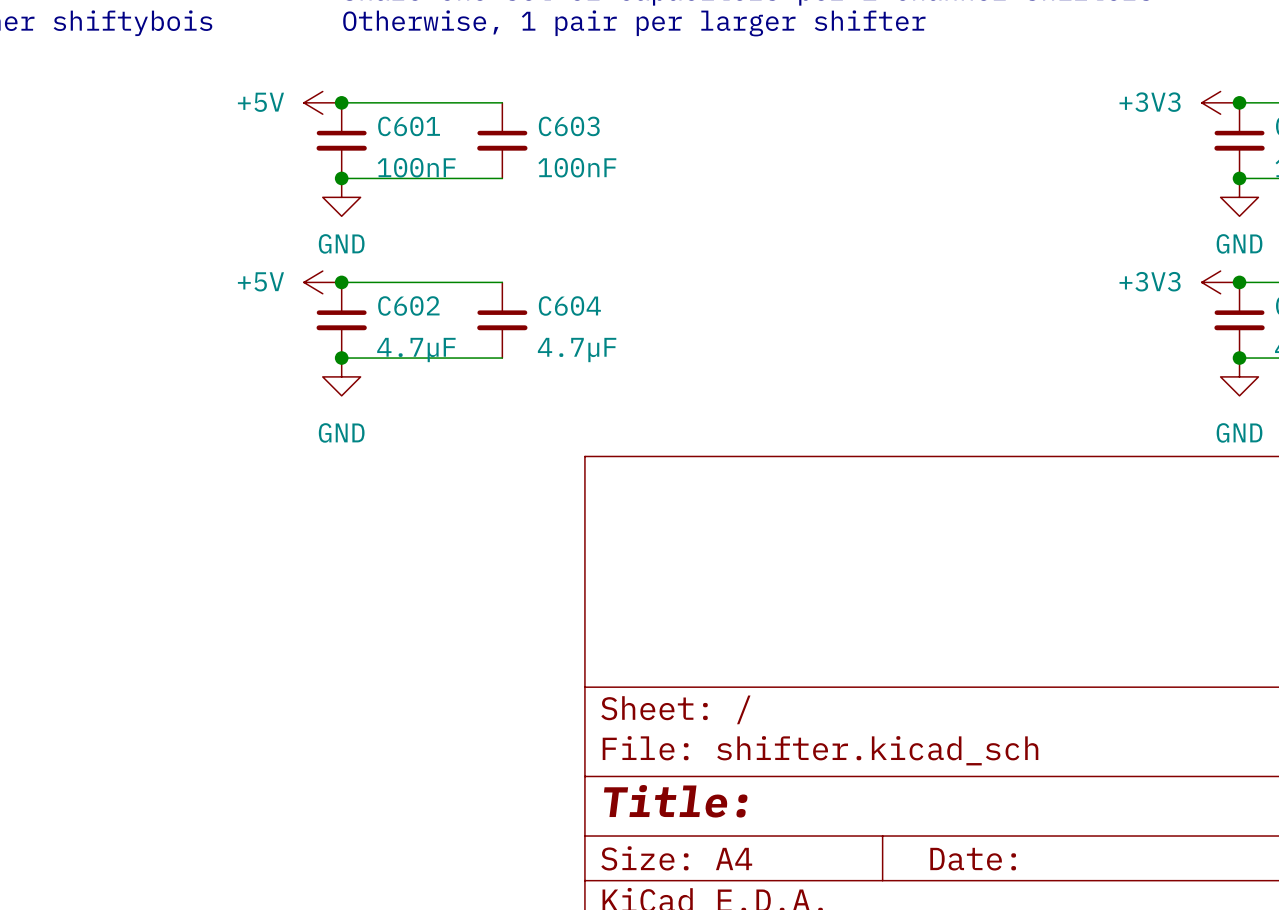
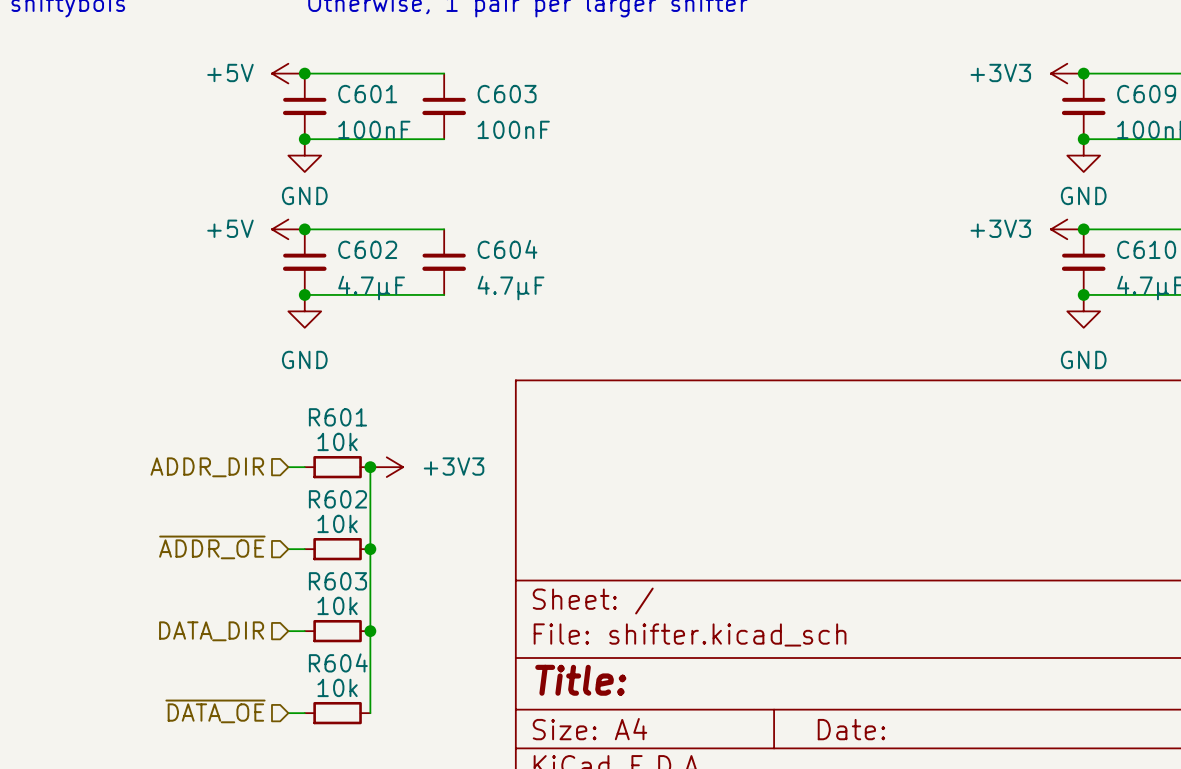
wire: none -> (288, 467) (304, 467)
R601: none -> 10k (337, 467)
wire: none -> (370, 467) (370, 713)
junction: none -> (370, 467)
power symbol: none -> +3V3 (386, 467)
hierarchical label: none -> ADDR_DIR (207, 467)
hierarchical label: none -> ~{ADDR_OE} (212, 547)
wire: none -> (288, 549) (304, 549)
R602: none -> 10k (337, 549)
junction: none -> (370, 549)
wire: none -> (288, 631) (304, 631)
R603: none -> 10k (337, 631)
junction: none -> (370, 631)
hierarchical label: none -> DATA_DIR (211, 631)
hierarchical label: none -> ~{DATA_OE} (215, 711)
wire: none -> (288, 713) (304, 713)
R604: none -> 10k (337, 713)

